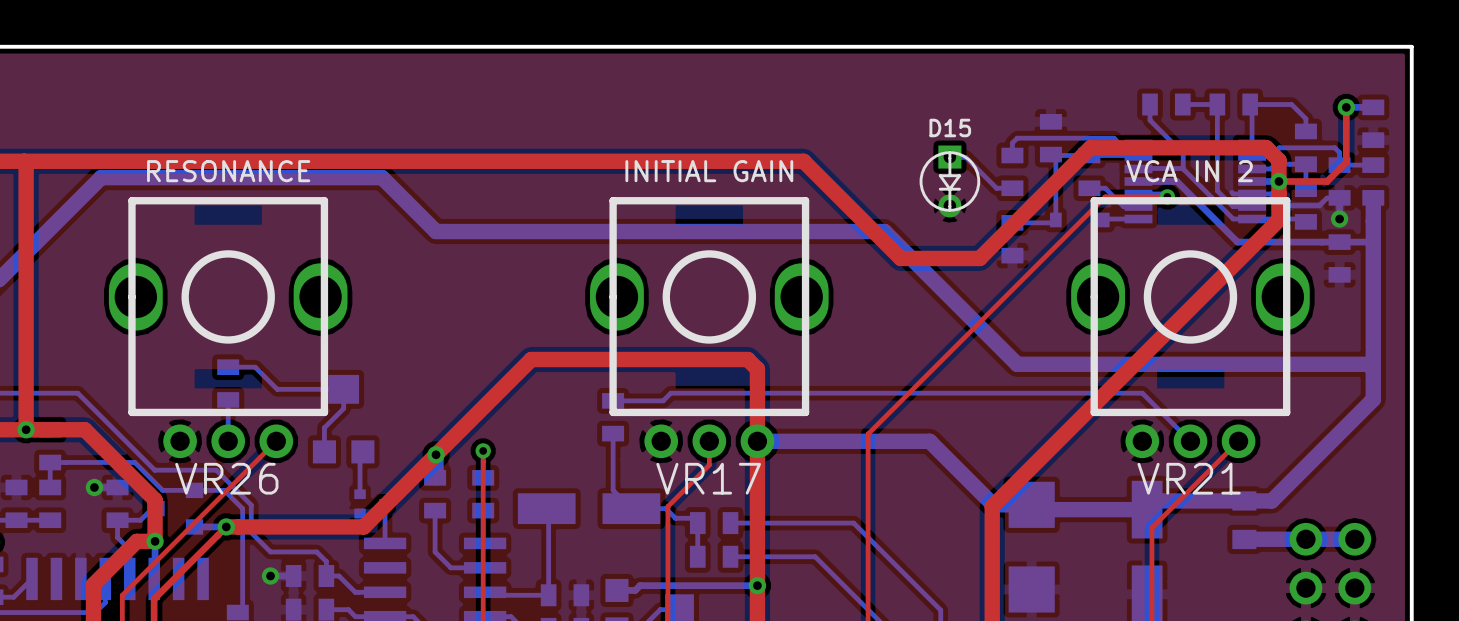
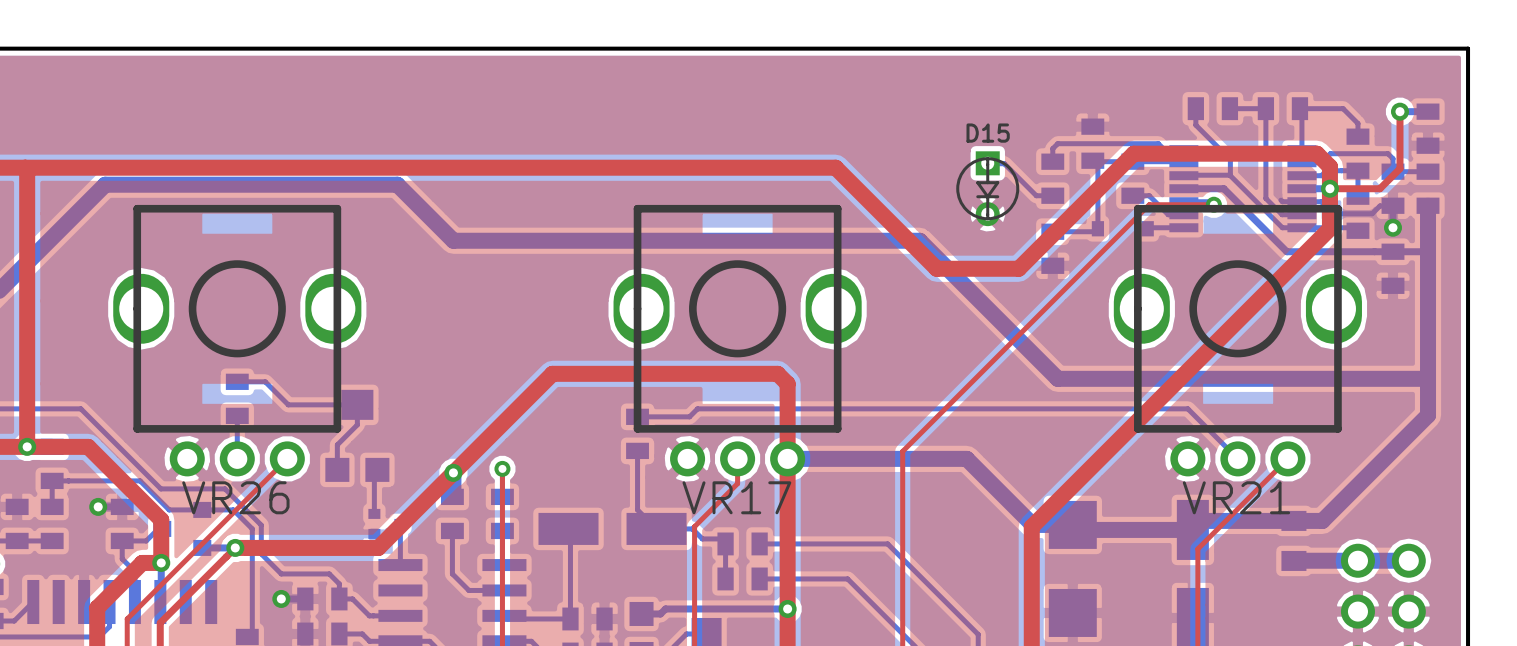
text: RESONANCE (228, 171) -> none
text: INITIAL GAIN (709, 171) -> none
text: VCA IN 2 (1189, 171) -> none

